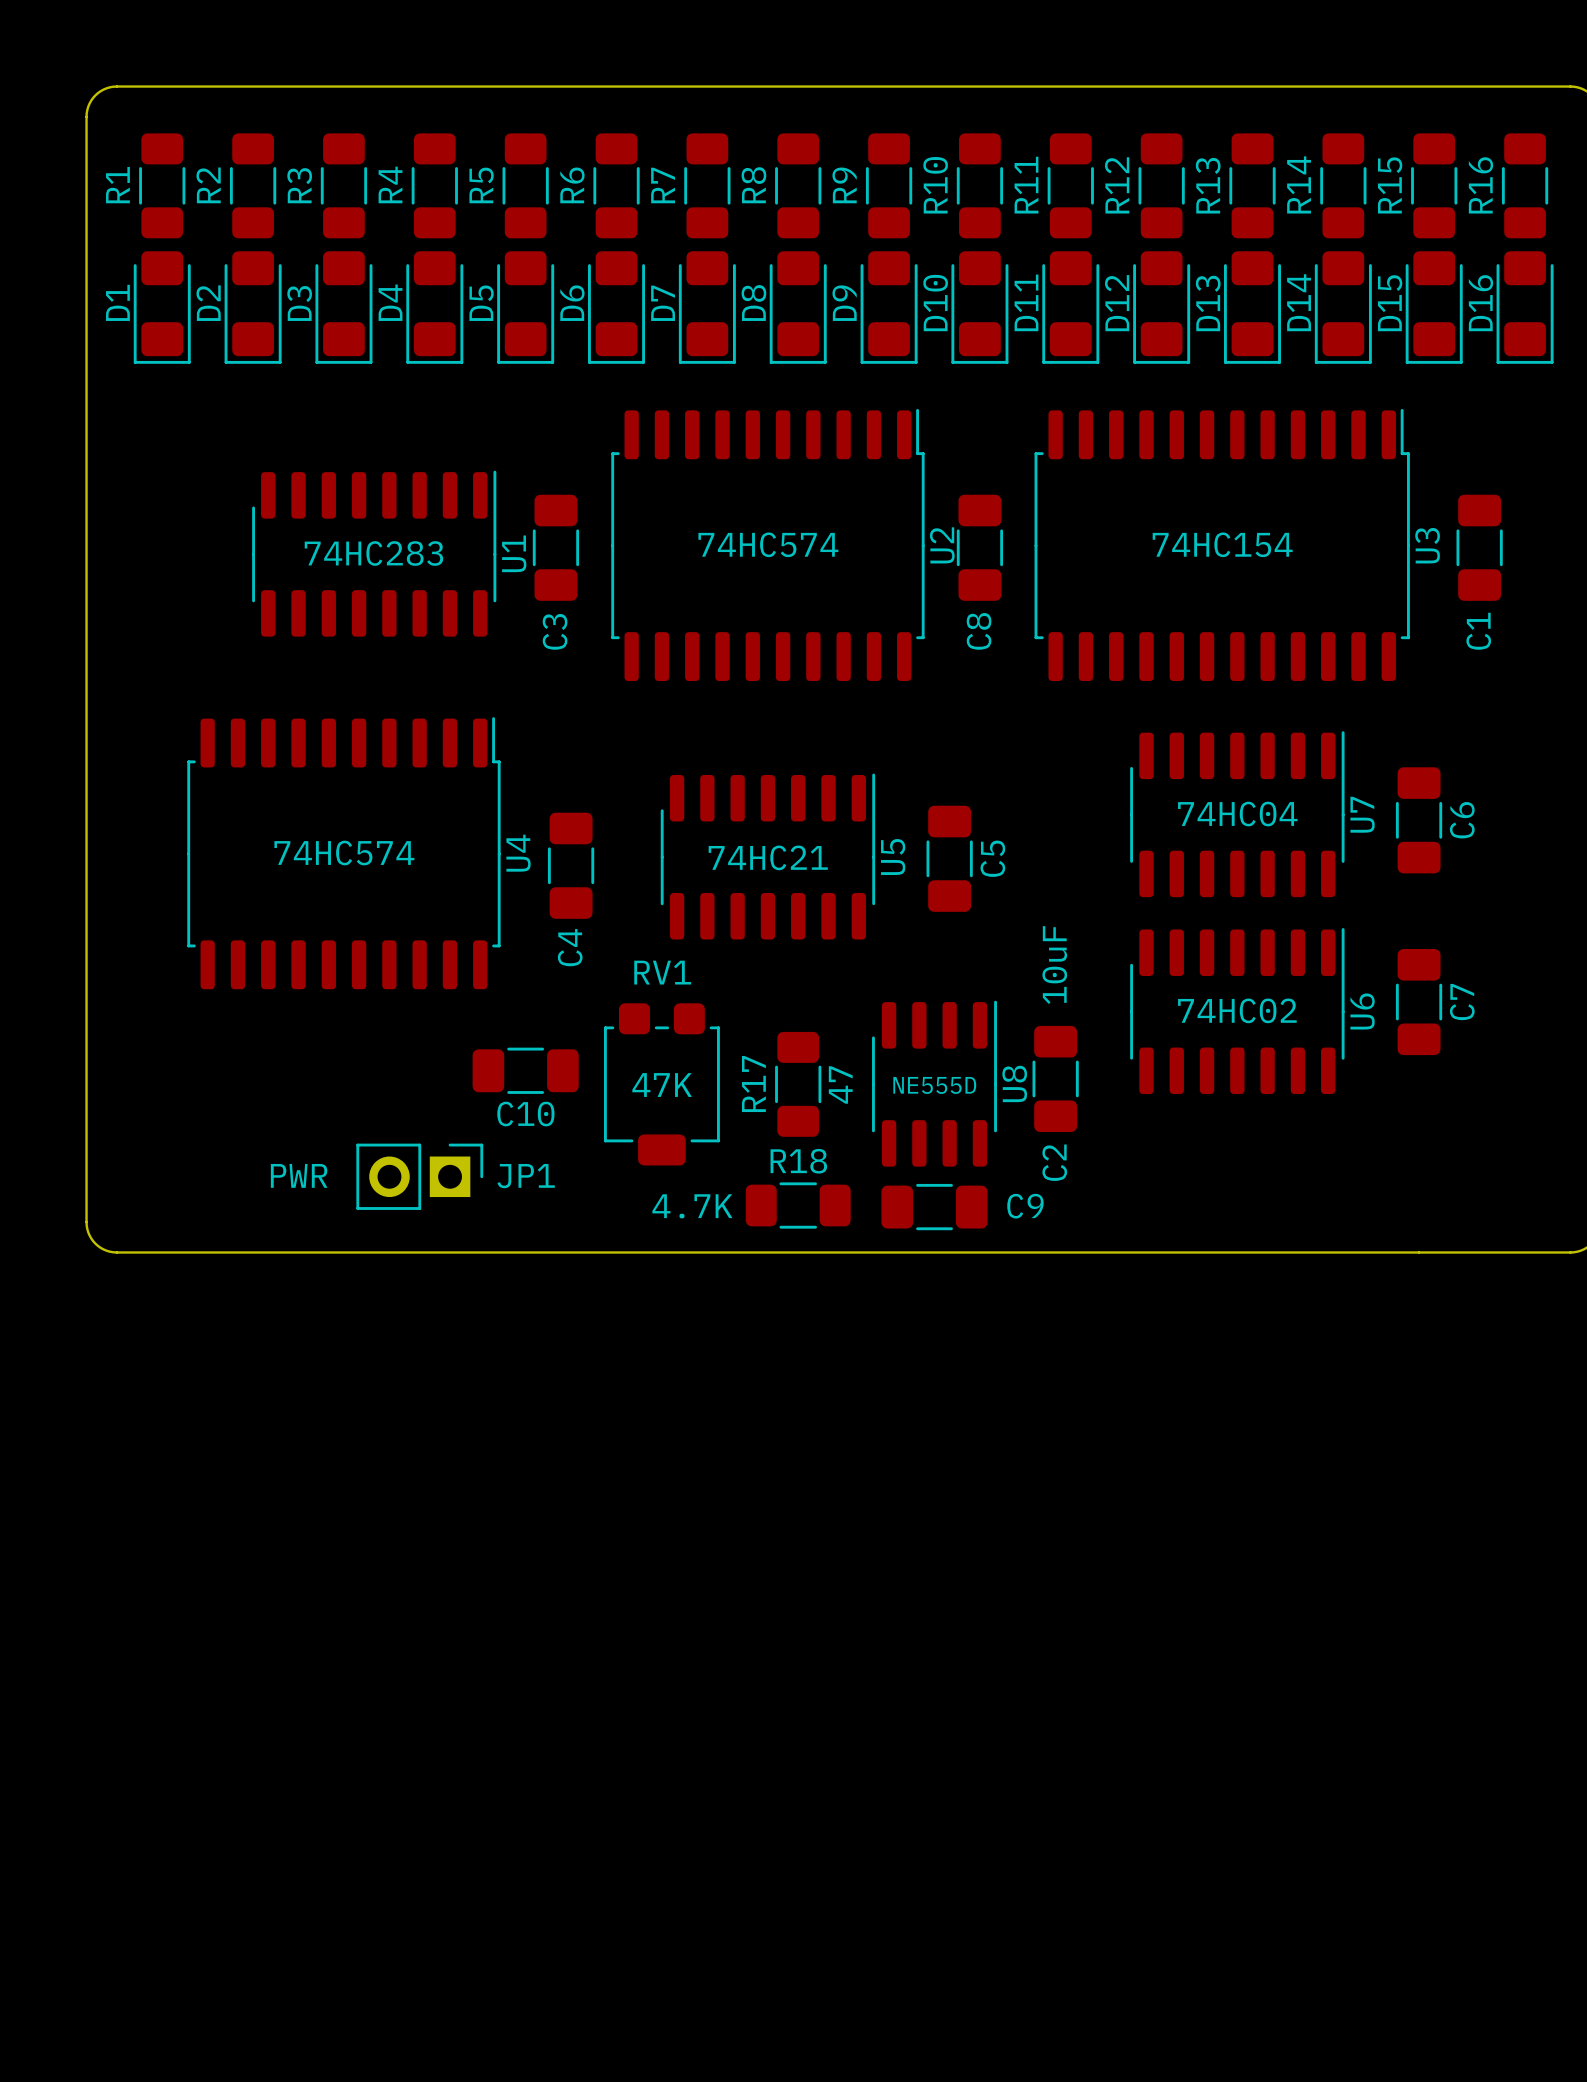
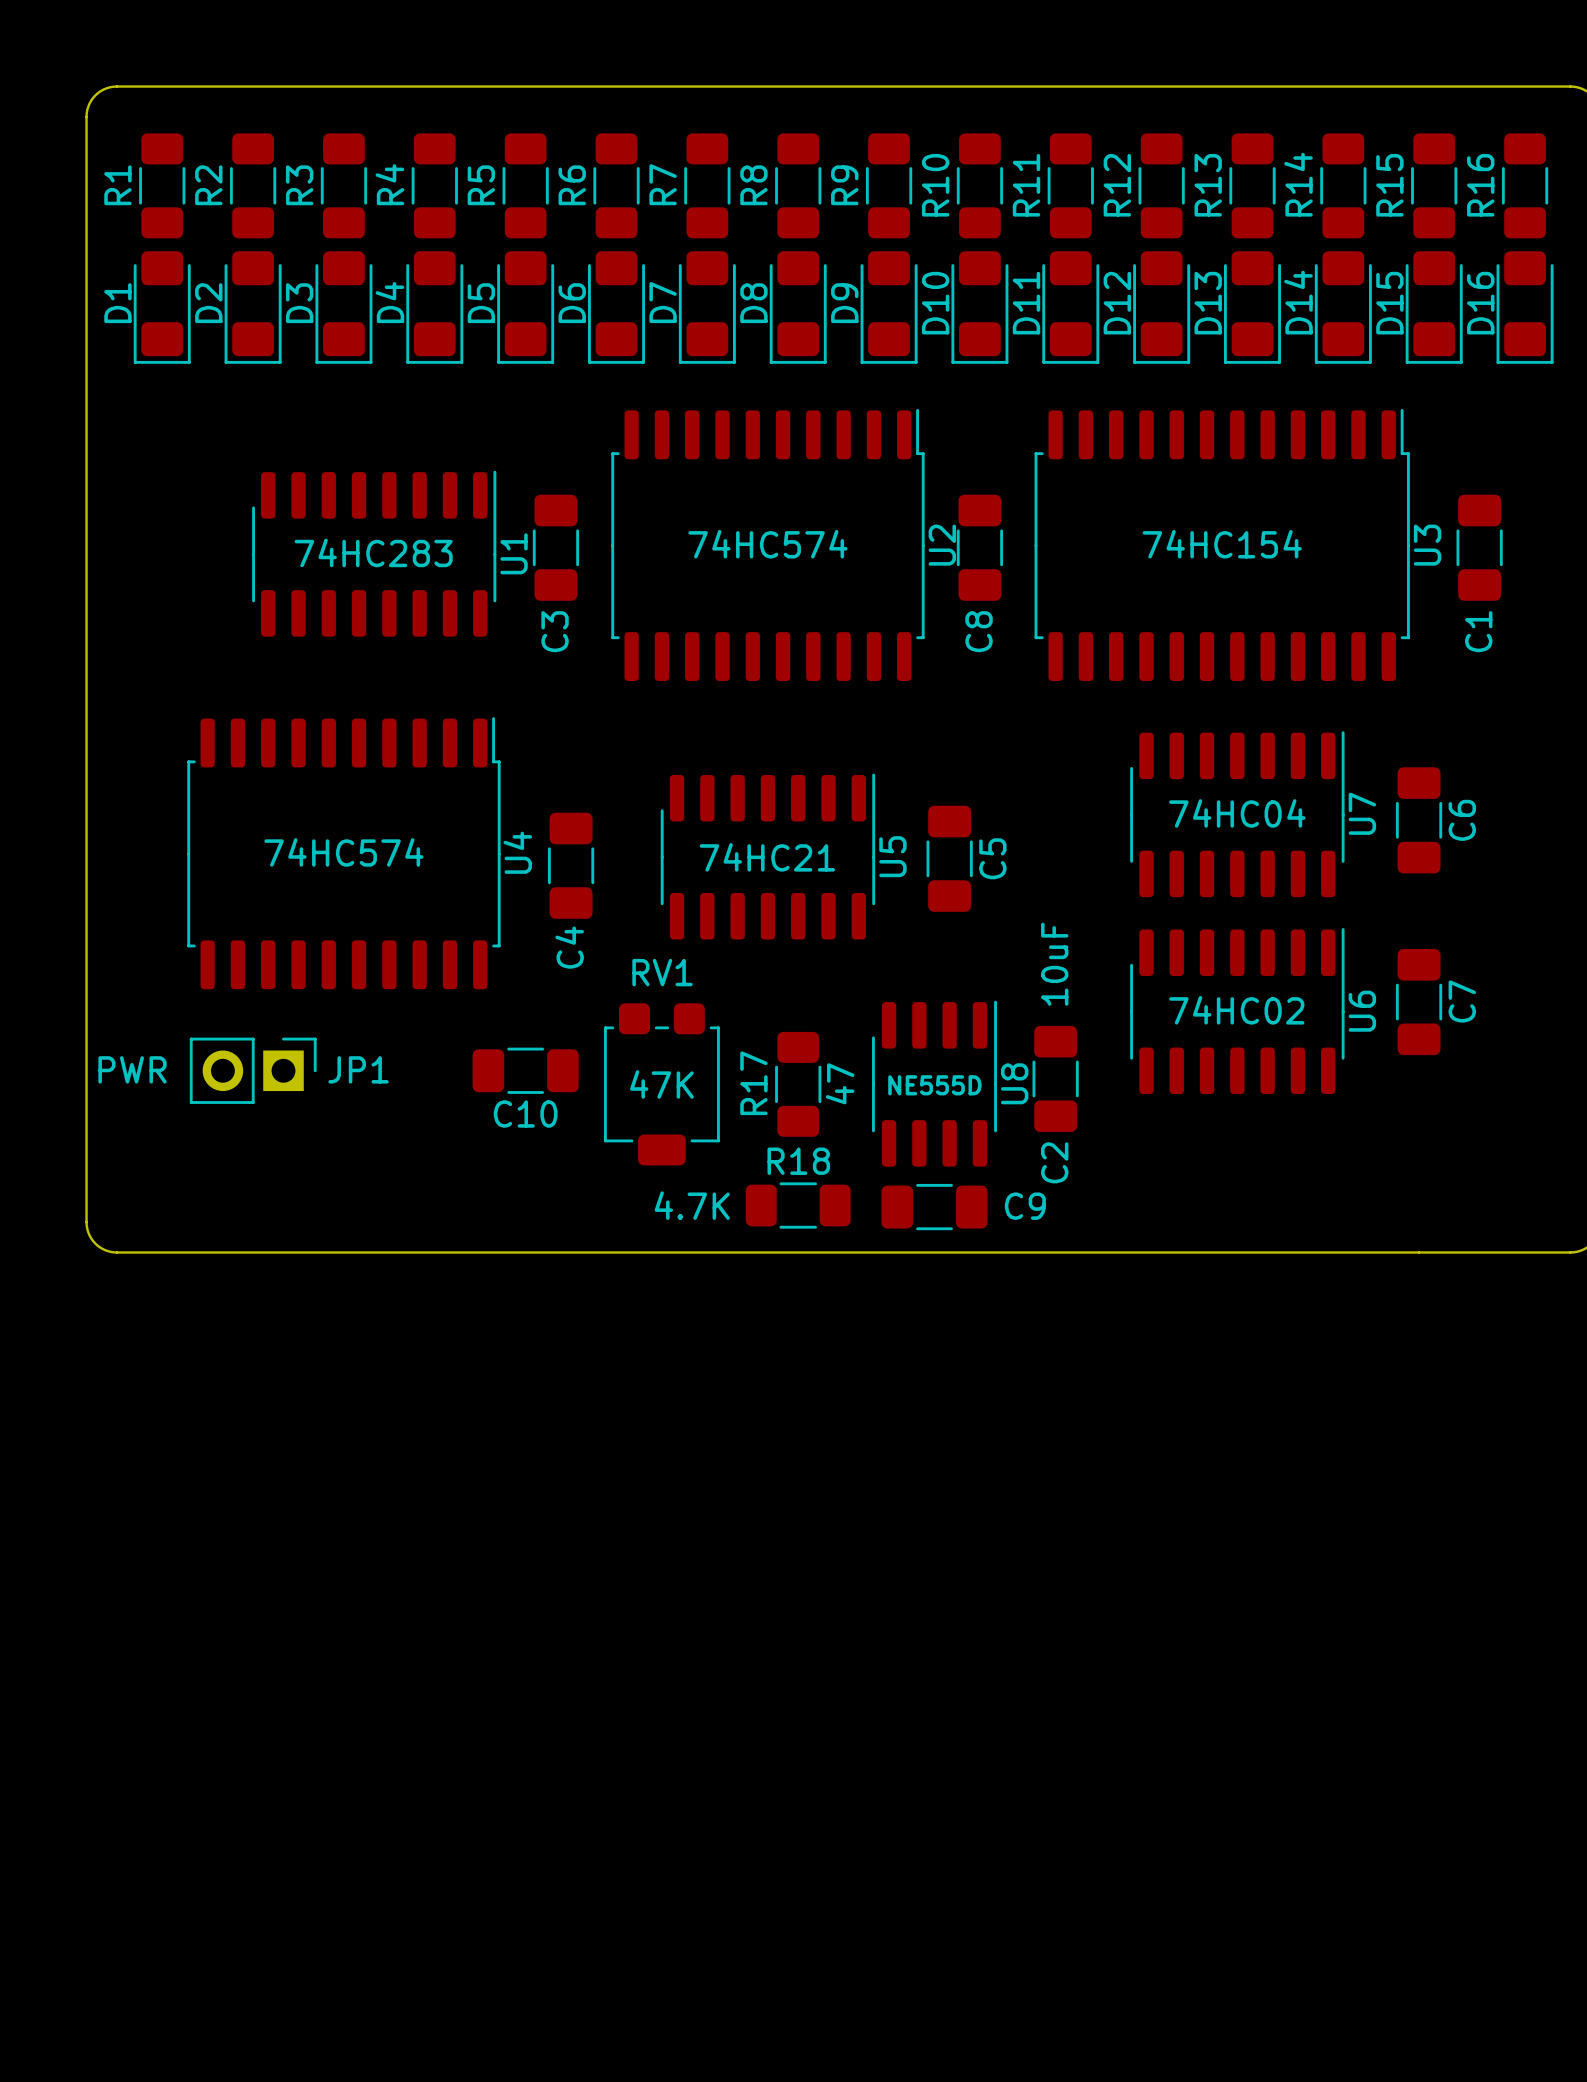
JP1 position: (419, 1176) -> (253, 1070)

